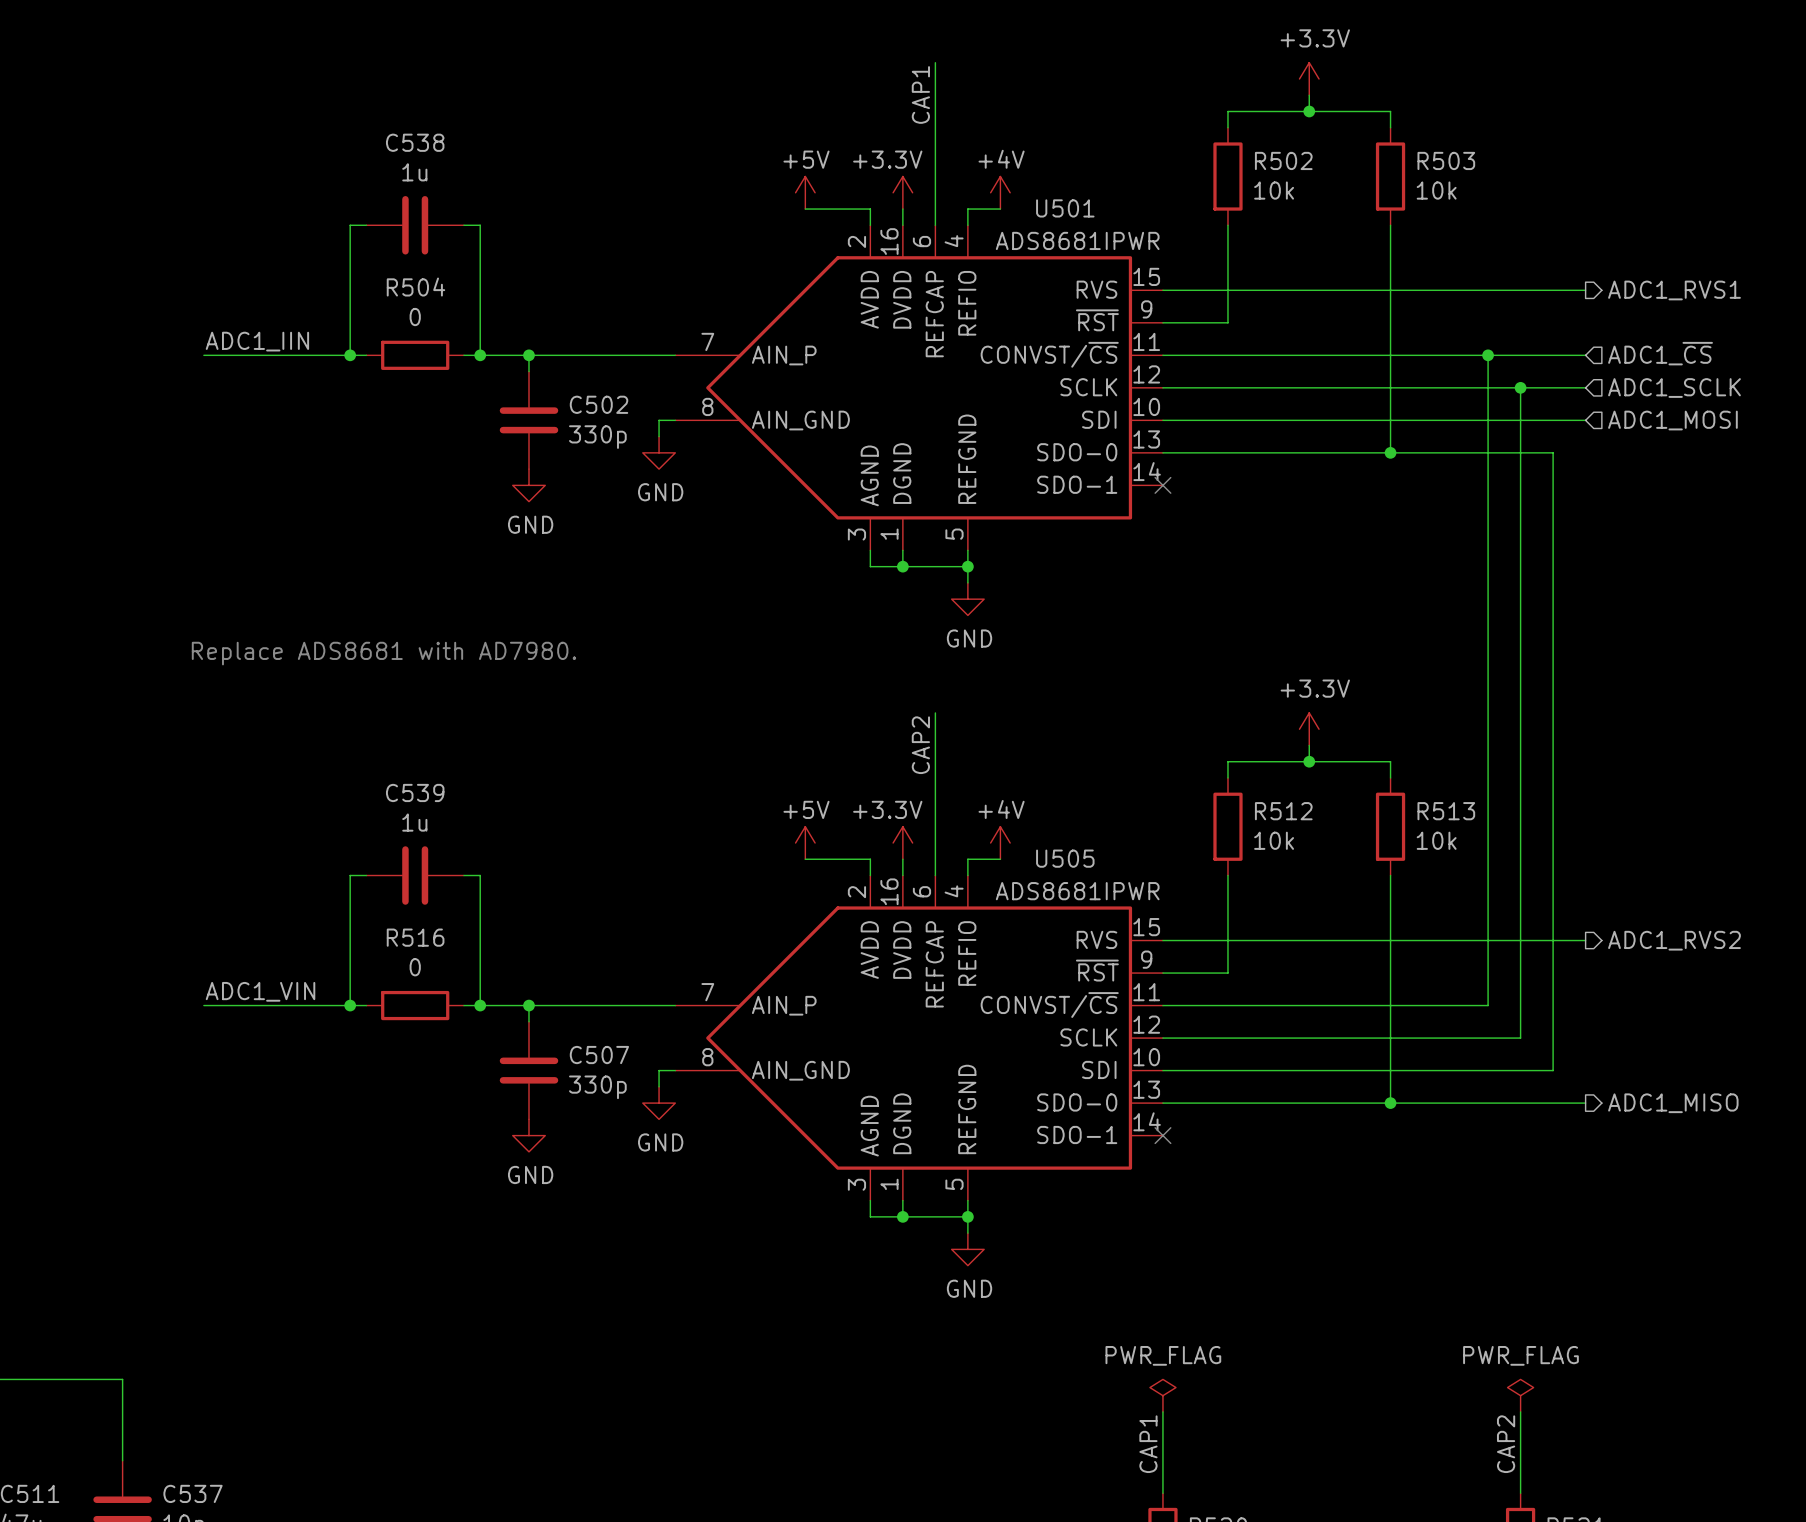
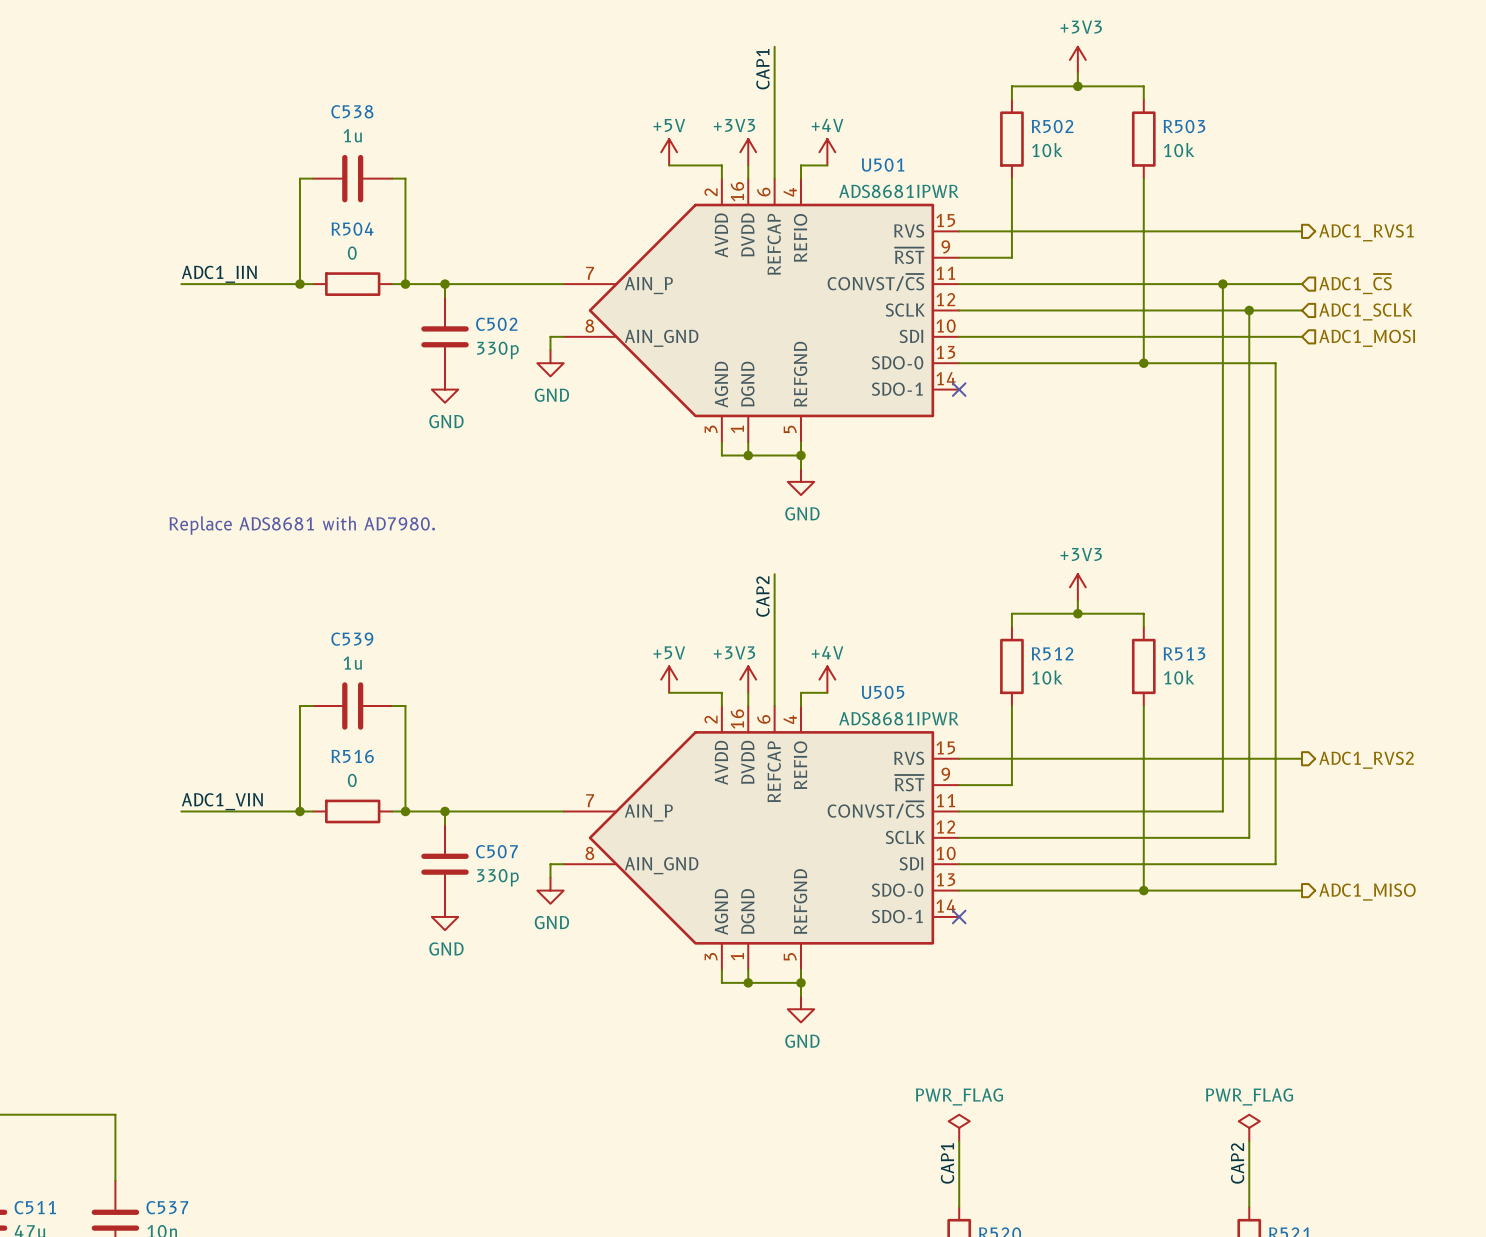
power symbol: +3.3V (1309, 78) -> +3V3 (1077, 59)
power symbol: +3.3V (902, 192) -> +3V3 (748, 152)
power symbol: +3.3V (1309, 729) -> +3V3 (1077, 587)
power symbol: +3.3V (902, 843) -> +3V3 (748, 679)

